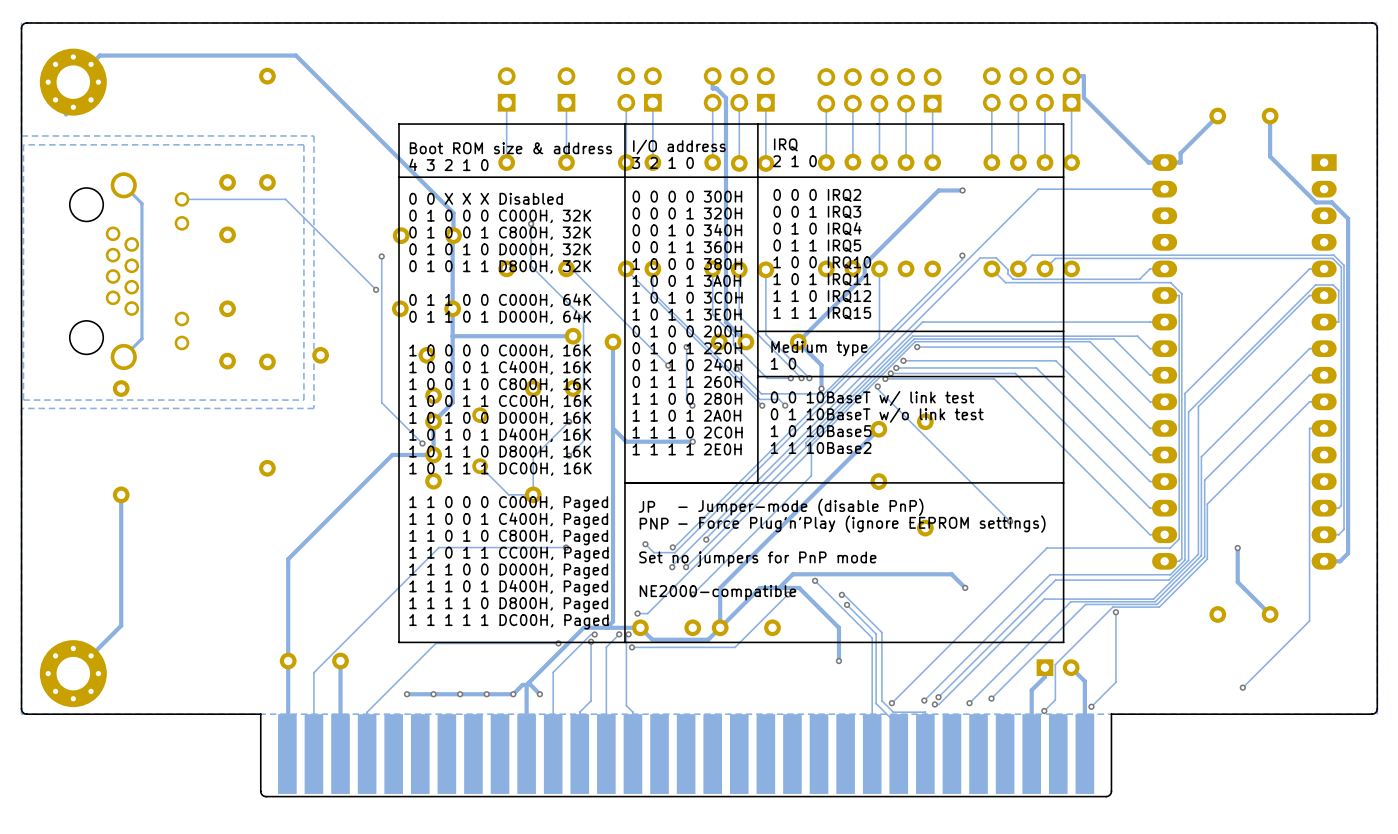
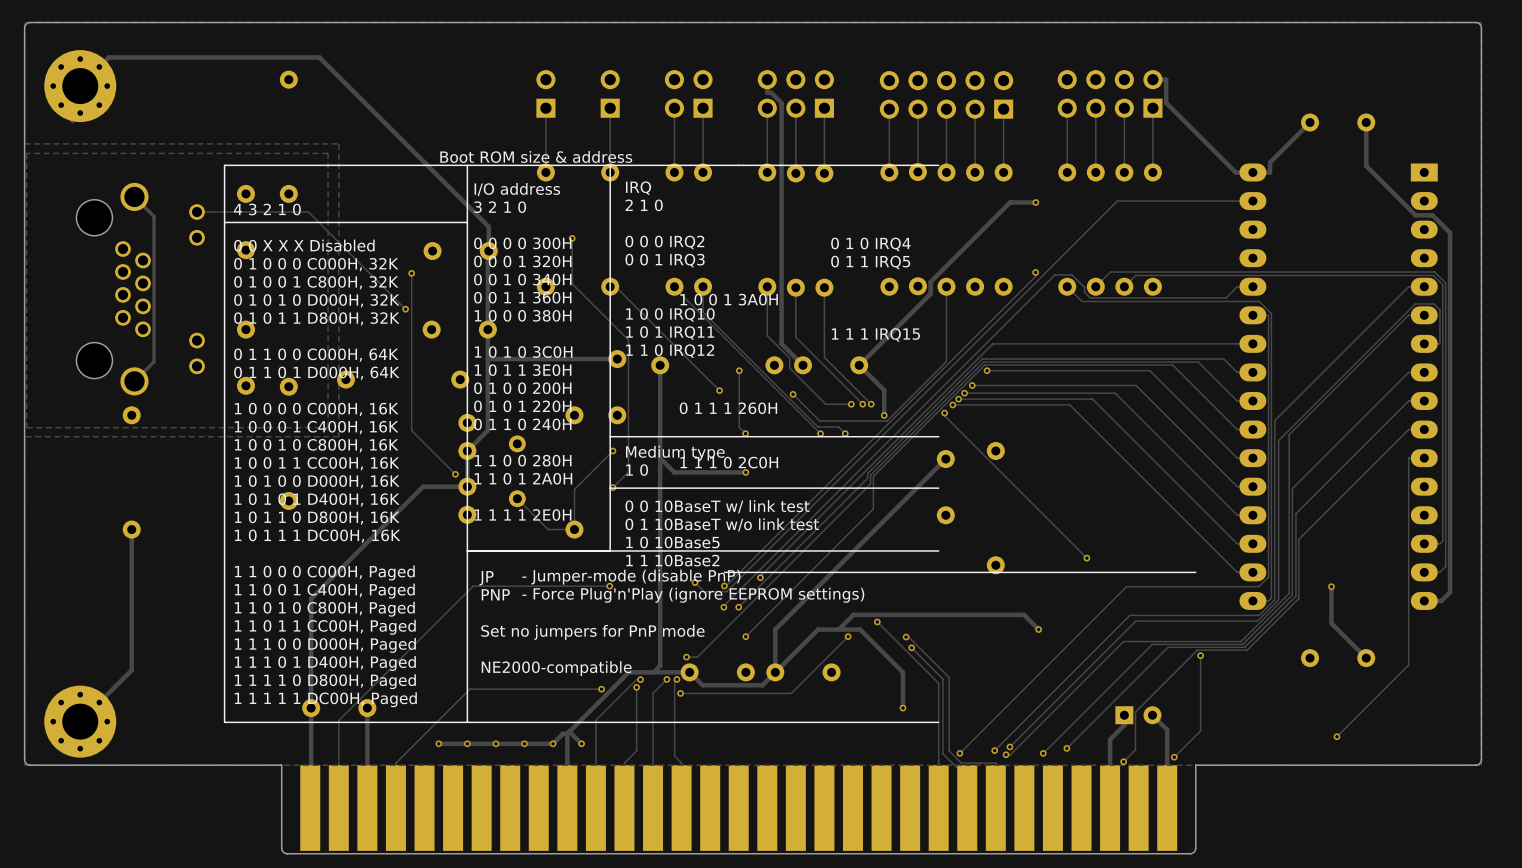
line: (624, 124) (624, 642) -> (467, 165) (467, 722)
line: (757, 124) (757, 482) -> (610, 165) (610, 550)
line: (1063, 124) (1063, 642) (399, 642) (399, 124) (1063, 124) -> none
text position: IRQ (785, 144) -> IRQ (638, 188)
text position: I/O address (679, 147) -> I/O address (517, 189)
line: none -> (938, 165) (224, 165) (224, 722) (938, 722)
text position: 2 1 0 (794, 161) -> 2 1 0 (644, 205)
text position: 3 2 1 0 (662, 162) -> 3 2 1 0 (500, 207)
text position: 4 3 2 1 0 (448, 164) -> 4 3 2 1 0 (267, 209)
line: (1063, 177) (399, 177) -> none
text position: 0 0 0 IRQ2 (817, 195) -> 0 0 0 IRQ2 (664, 242)
text position: 0 0 0 0 300H (687, 196) -> 0 0 0 0 300H (522, 243)
text position: 0 0 X X X Disabled (486, 198) -> 0 0 X X X Disabled (304, 245)
line: none -> (467, 222) (224, 222)
text position: 0 0 1 IRQ3 (817, 212) -> 0 0 1 IRQ3 (665, 260)
text position: 0 0 0 1 320H (687, 213) -> 0 0 0 1 320H (522, 261)
text position: 0 1 0 0 0 C000H, 32K (500, 216) -> 0 1 0 0 0 C000H, 32K (316, 264)
text position: 0 0 1 0 340H (687, 230) -> 0 0 1 0 340H (522, 279)
text position: 0 1 0 0 1 C800H, 32K (500, 233) -> 0 1 0 0 1 C800H, 32K (316, 282)
text position: 0 0 1 1 360H (687, 247) -> 0 0 1 1 360H (522, 297)
text position: 0 1 0 1 0 D000H, 32K (500, 250) -> 0 1 0 1 0 D000H, 32K (316, 300)
text position: 1 0 0 IRQ10 (822, 262) -> 1 0 0 IRQ10 (670, 314)
text position: 1 0 0 0 380H (687, 264) -> 1 0 0 0 380H (523, 315)
text position: 0 1 0 1 1 D800H, 32K (500, 266) -> 0 1 0 1 1 D800H, 32K (316, 318)
text position: 1 0 1 IRQ11 (822, 279) -> 1 0 1 IRQ11 (670, 332)
text position: 1 1 0 IRQ12 (822, 296) -> 1 1 0 IRQ12 (670, 351)
text position: 1 0 1 0 3C0H (687, 297) -> 1 0 1 0 3C0H (523, 352)
text position: 0 1 1 0 0 C000H, 64K (500, 300) -> 0 1 1 0 0 C000H, 64K (316, 355)
text position: 1 0 1 1 3E0H (687, 314) -> 1 0 1 1 3E0H (523, 370)
text position: 0 1 1 0 1 D000H, 64K (500, 317) -> 0 1 1 0 1 D000H, 64K (316, 373)
text position: 0 1 0 0 200H (687, 331) -> 0 1 0 0 200H (522, 388)
line: (1063, 331) (757, 331) -> (938, 488) (610, 488)
text position: 0 1 0 1 220H (687, 348) -> 0 1 0 1 220H (522, 406)
text position: Medium type (819, 348) -> Medium type (675, 453)
text position: 1 0 0 0 0 C000H, 16K (500, 351) -> 1 0 0 0 0 C000H, 16K (316, 409)
text position: 1 0 (783, 363) -> 1 0 (637, 470)
text position: 0 1 1 0 240H (687, 364) -> 0 1 1 0 240H (522, 424)
text position: 1 0 0 0 1 C400H, 16K (500, 367) -> 1 0 0 0 1 C400H, 16K (316, 427)
line: (1063, 376) (757, 376) -> (938, 436) (610, 436)
text position: 1 0 0 1 0 C800H, 16K (500, 384) -> 1 0 0 1 0 C800H, 16K (316, 445)
text position: 1 1 0 0 280H (687, 398) -> 1 1 0 0 280H (523, 460)
text position: 0 0 10BaseT w/ link test (872, 398) -> 0 0 10BaseT w/ link test (717, 506)
text position: 1 0 0 1 1 CC00H, 16K (500, 401) -> 1 0 0 1 1 CC00H, 16K (317, 463)
text position: 1 1 0 1 2A0H (686, 415) -> 1 1 0 1 2A0H (523, 478)
text position: 0 1 10BaseT w/o link test (877, 415) -> 0 1 10BaseT w/o link test (722, 524)
text position: 1 0 1 0 0 D000H, 16K (500, 418) -> 1 0 1 0 0 D000H, 16K (317, 481)
text position: 1 0 10Base5 (821, 431) -> 1 0 10Base5 (672, 542)
text position: 1 0 1 0 1 D400H, 16K (500, 435) -> 1 0 1 0 1 D400H, 16K (317, 499)
text position: 1 1 10Base2 (821, 447) -> 1 1 10Base2 (672, 560)
text position: 1 1 1 1 2E0H (687, 449) -> 1 1 1 1 2E0H (523, 514)
text position: 1 0 1 1 0 D800H, 16K (500, 452) -> 1 0 1 1 0 D800H, 16K (317, 518)
text position: 1 0 1 1 1 DC00H, 16K (500, 469) -> 1 0 1 1 1 DC00H, 16K (317, 536)
line: (1063, 482) (624, 482) -> (938, 550) (467, 550)
text position: 1 1 0 0 0 C000H, Paged (508, 503) -> 1 1 0 0 0 C000H, Paged (324, 572)
text position: JP (646, 506) -> JP (486, 578)
text position: - Jumper-mode (disable PnP) (800, 507) -> - Jumper-mode (disable PnP) (631, 577)
text position: 1 1 0 0 1 C400H, Paged (508, 520) -> 1 1 0 0 1 C400H, Paged (324, 591)
text position: PNP (654, 523) -> PNP (495, 594)
text position: - Force Plug'n'Play (ignore EEPROM settings) (861, 524) -> - Force Plug'n'Play (ignore EEPROM settings) (693, 595)
line: none -> (1195, 572) (724, 572)
text position: 1 1 0 1 0 C800H, Paged (508, 537) -> 1 1 0 1 0 C800H, Paged (324, 609)
text position: 1 1 0 1 1 CC00H, Paged (508, 554) -> 1 1 0 1 1 CC00H, Paged (325, 627)
text position: Set no jumpers for PnP mode (757, 559) -> Set no jumpers for PnP mode (592, 632)
text position: 1 1 1 0 0 D000H, Paged (508, 571) -> 1 1 1 0 0 D000H, Paged (325, 645)
text position: 1 1 1 0 1 D400H, Paged (508, 587) -> 1 1 1 0 1 D400H, Paged (325, 663)
text position: NE2000-compatible (717, 592) -> NE2000-compatible (556, 668)
text position: 1 1 1 1 0 D800H, Paged (508, 604) -> 1 1 1 1 0 D800H, Paged (325, 681)
text position: 1 1 1 1 1 DC00H, Paged (508, 621) -> 1 1 1 1 1 DC00H, Paged (325, 699)

